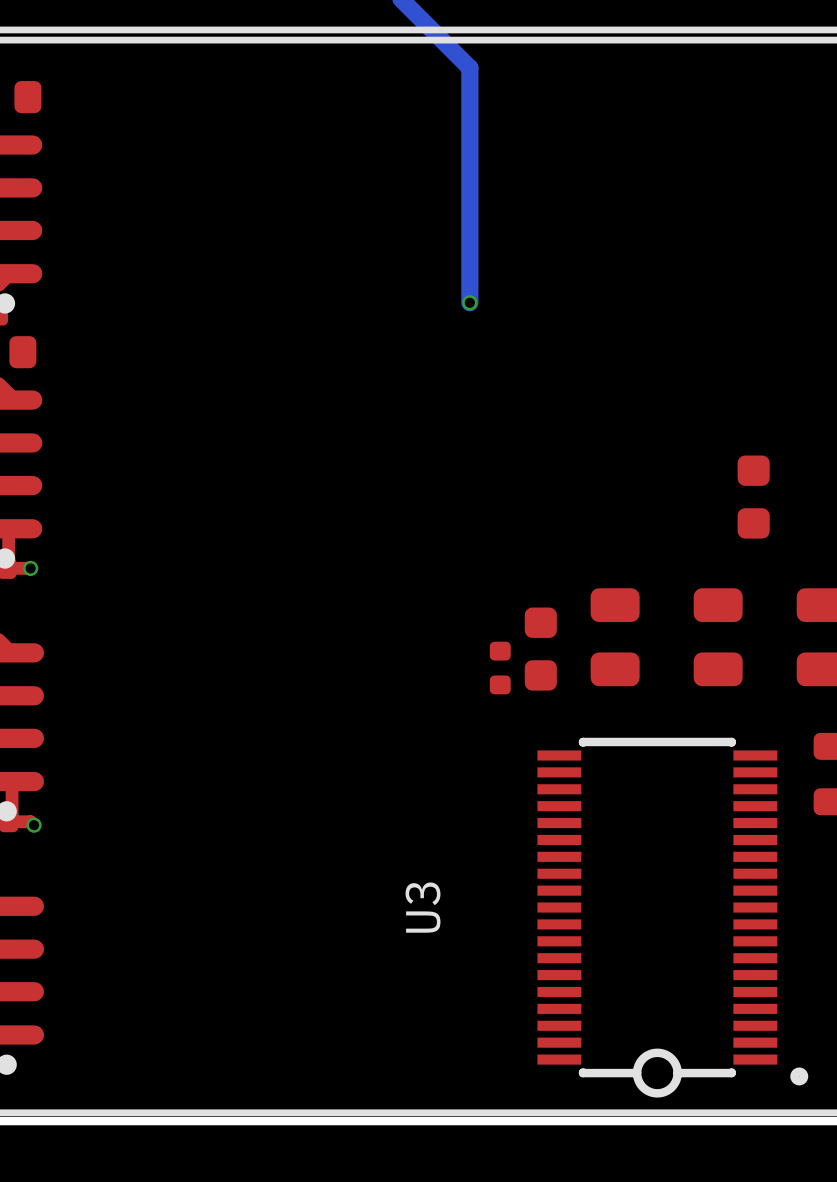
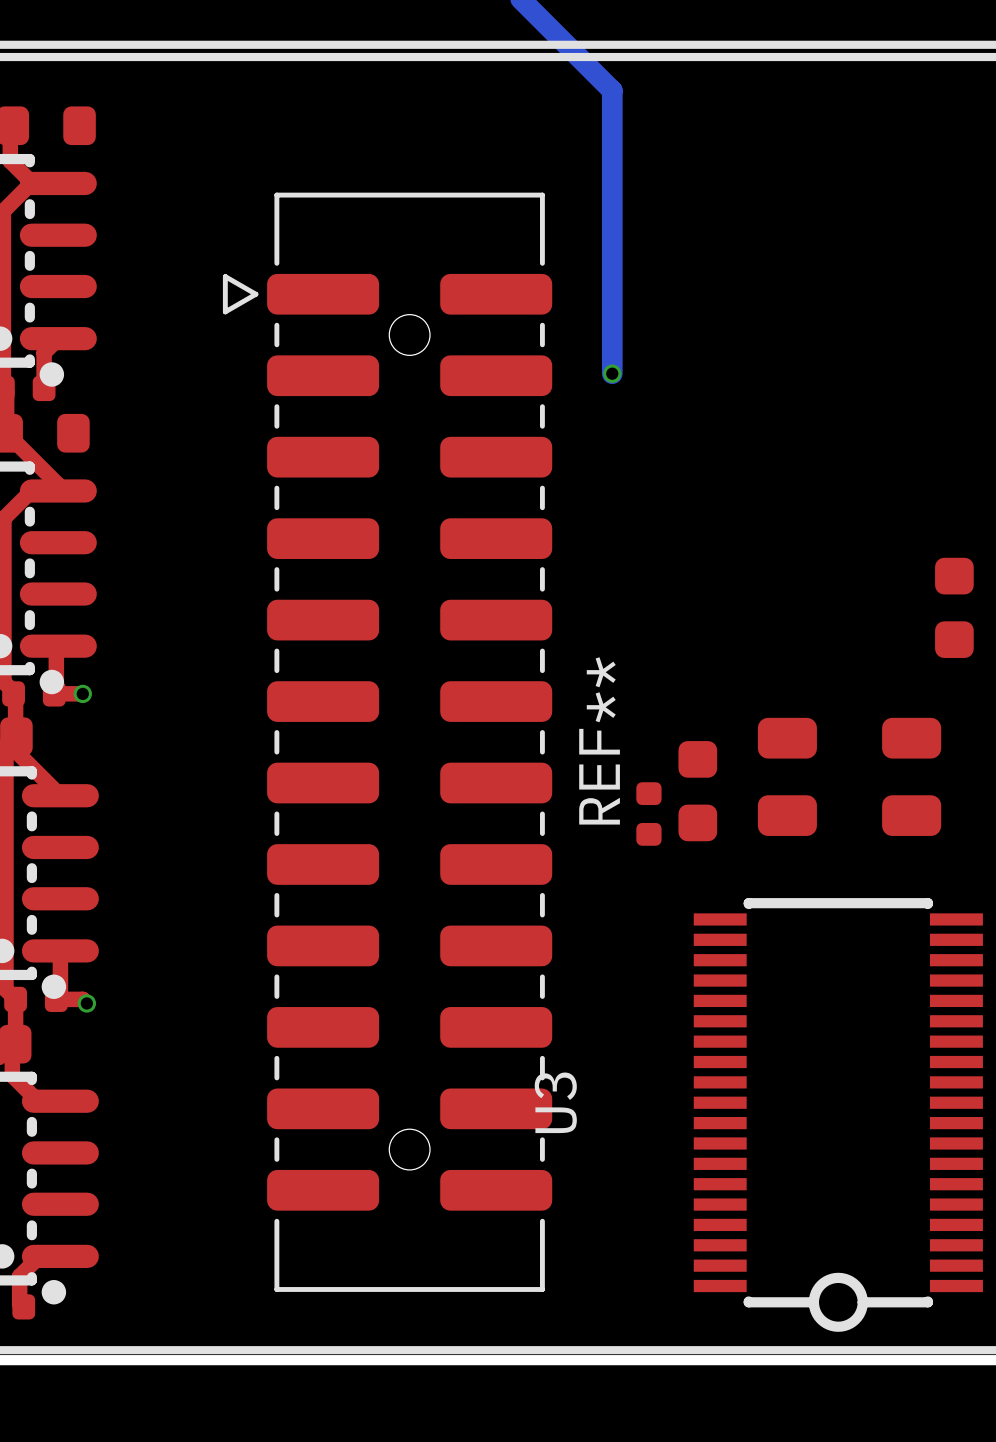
REF**: none -> (387, 742)

